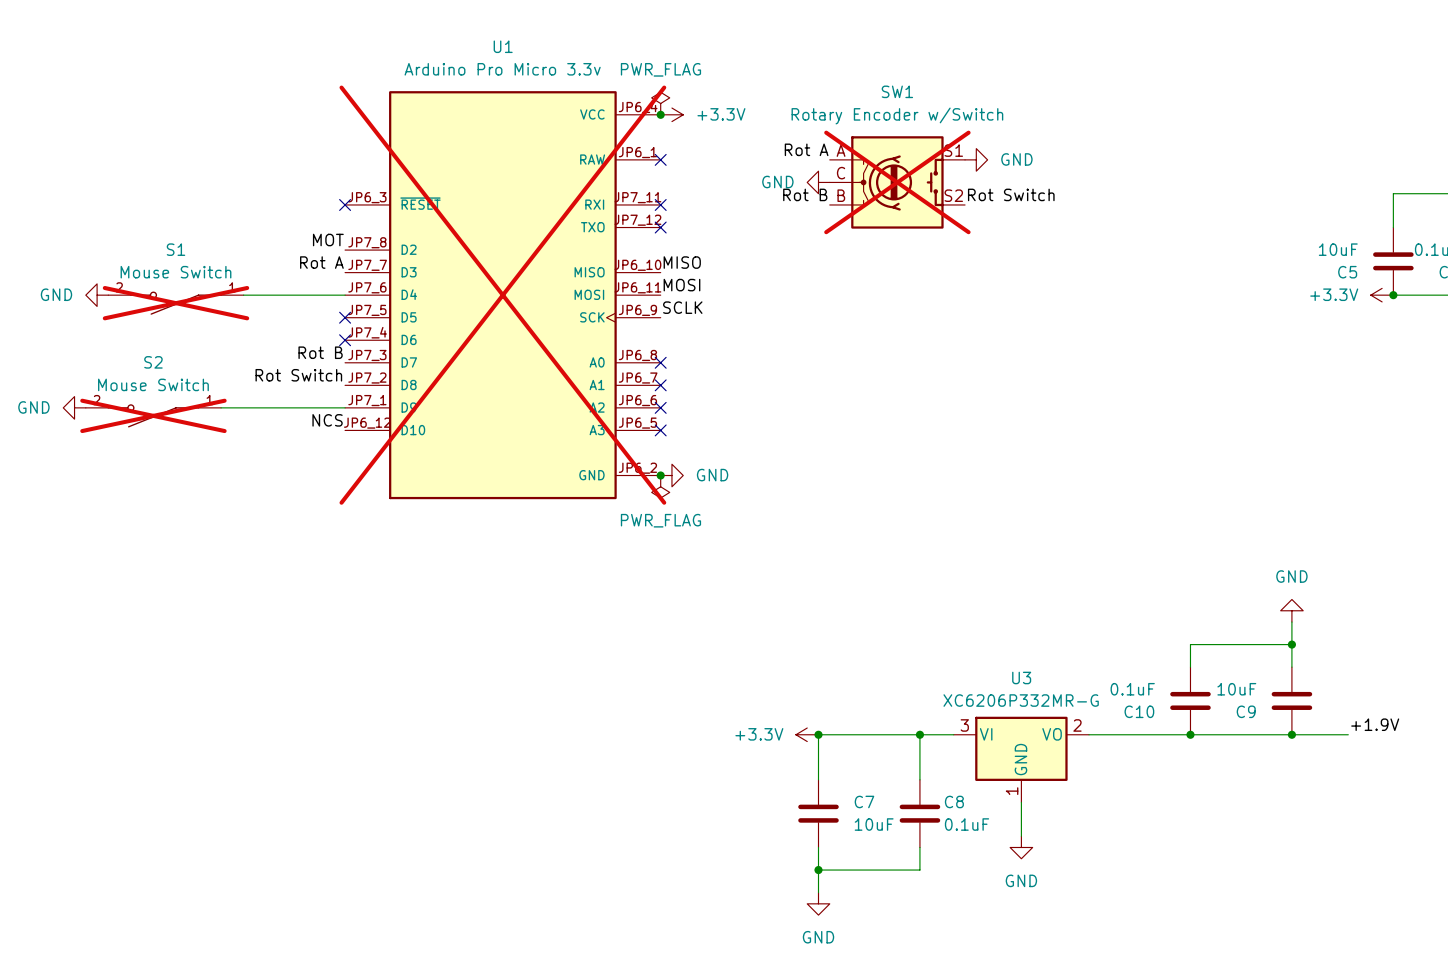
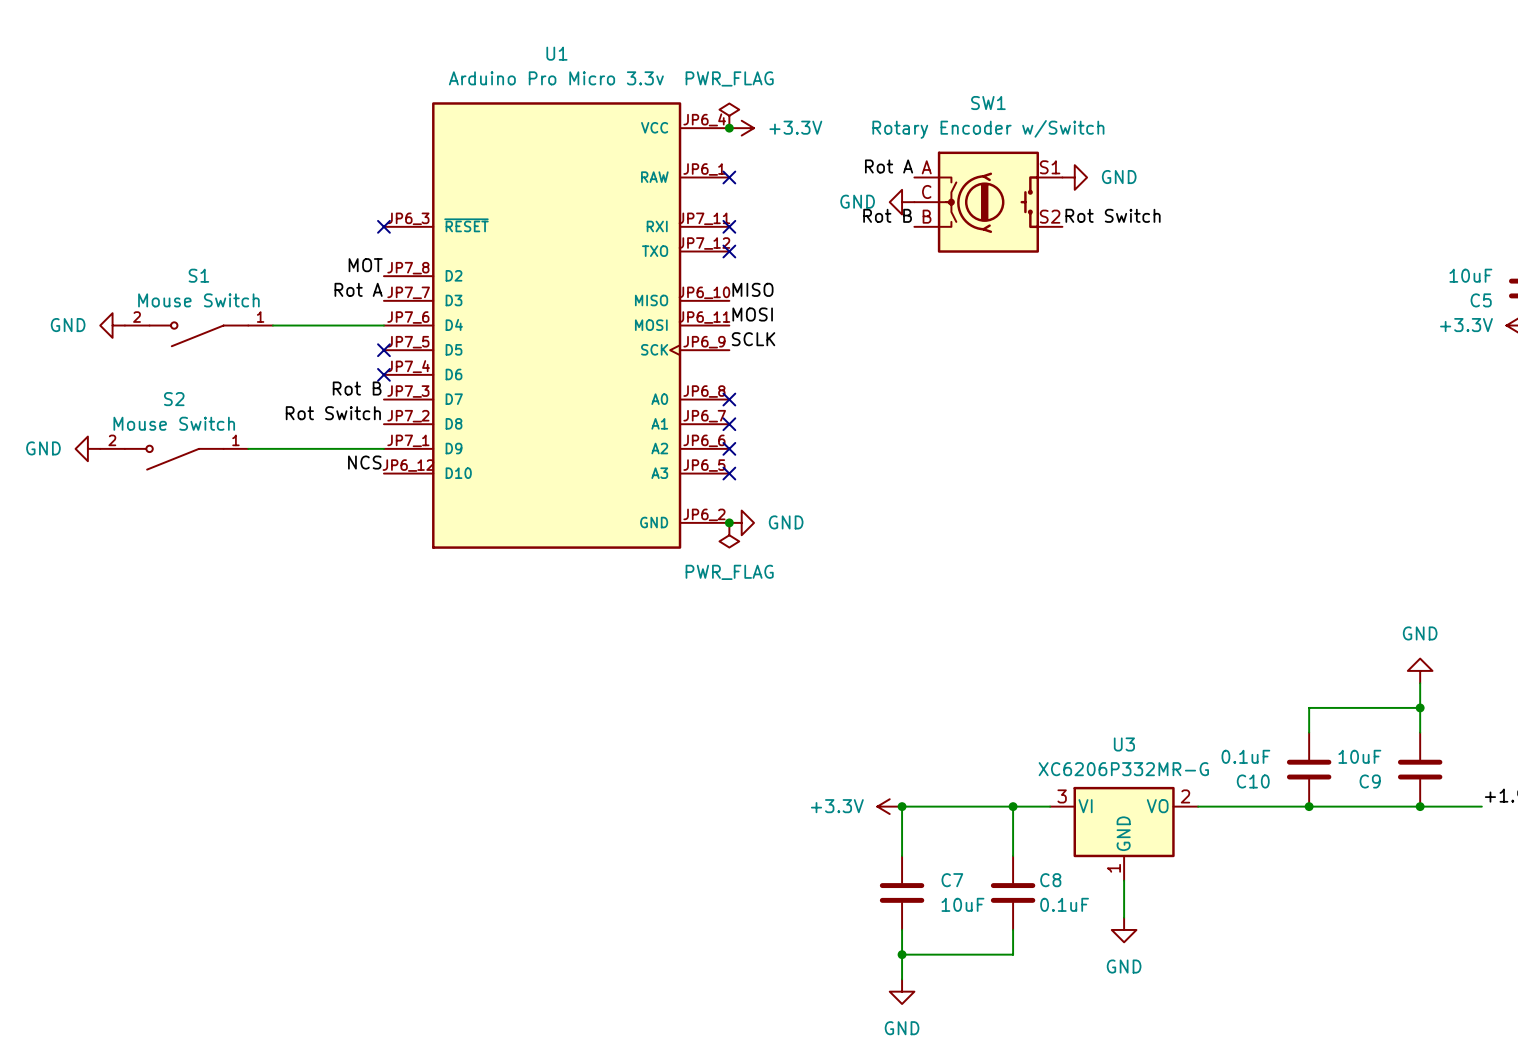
SW1 do-not-place cross: (897, 182) -> none
U1 do-not-place cross: (502, 295) -> none
S1 do-not-place cross: (175, 303) -> none
S2 do-not-place cross: (153, 415) -> none

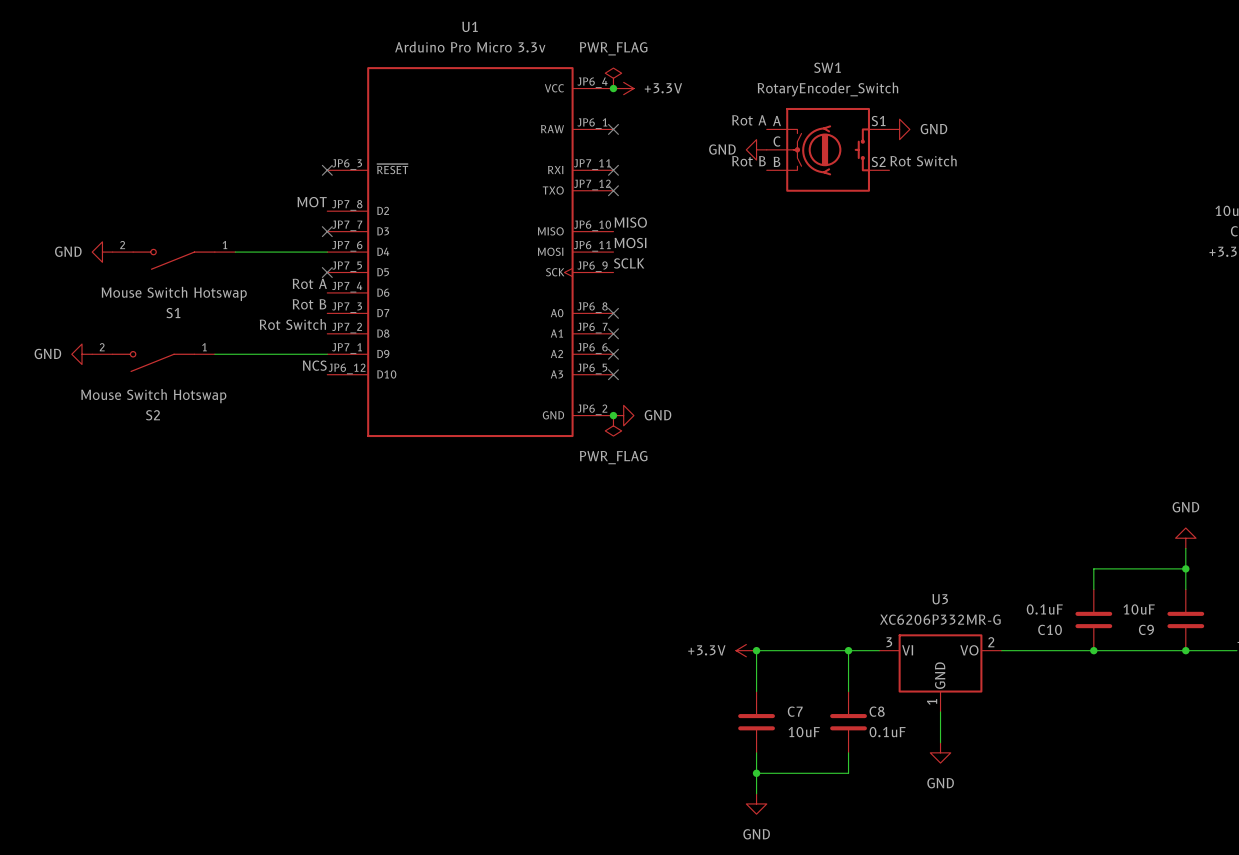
SW1 value: Rotary Encoder w/Switch (988, 129) -> RotaryEncoder_Switch (827, 89)
S1 name position: S1 (198, 275) -> S1 (173, 313)
label position: Rot A (358, 289) -> Rot A (309, 283)
S1 value: Mouse Switch (198, 300) -> Mouse Switch Hotswap (174, 293)
no-connect mark: none -> (327, 231)
no-connect mark: (383, 374) -> none
S2 name position: S2 (174, 399) -> S2 (153, 415)
S2 value: Mouse Switch (174, 423) -> Mouse Switch Hotswap (153, 396)

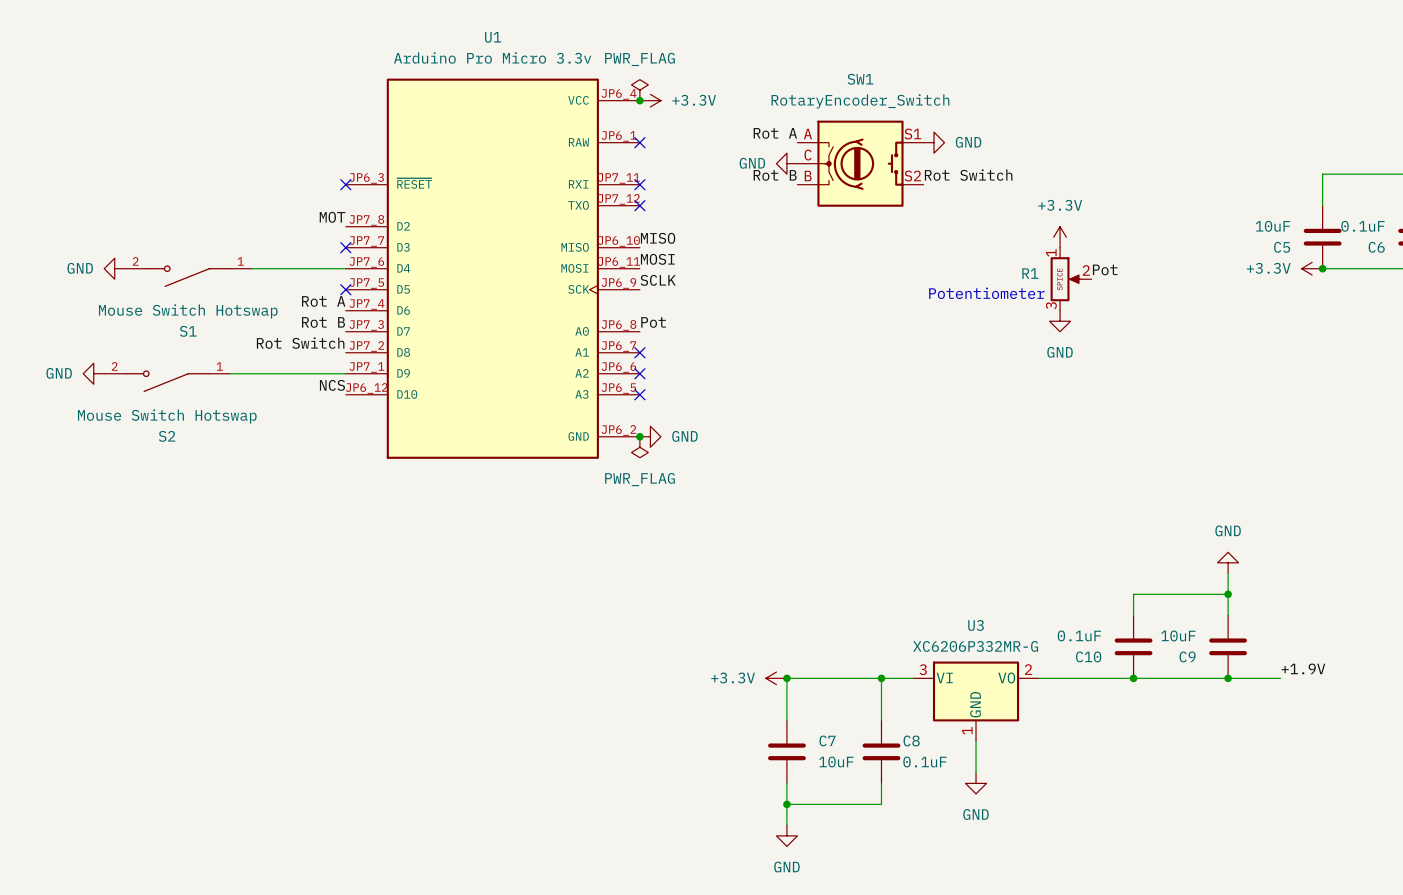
power symbol: none -> +3.3V (1060, 237)
label: none -> Pot (1105, 269)
R1: none -> (1071, 279)
text: none -> Potentiometer (986, 293)
power symbol: none -> GND (1060, 321)
label: none -> Pot (653, 322)
no-connect mark: (613, 313) -> none

